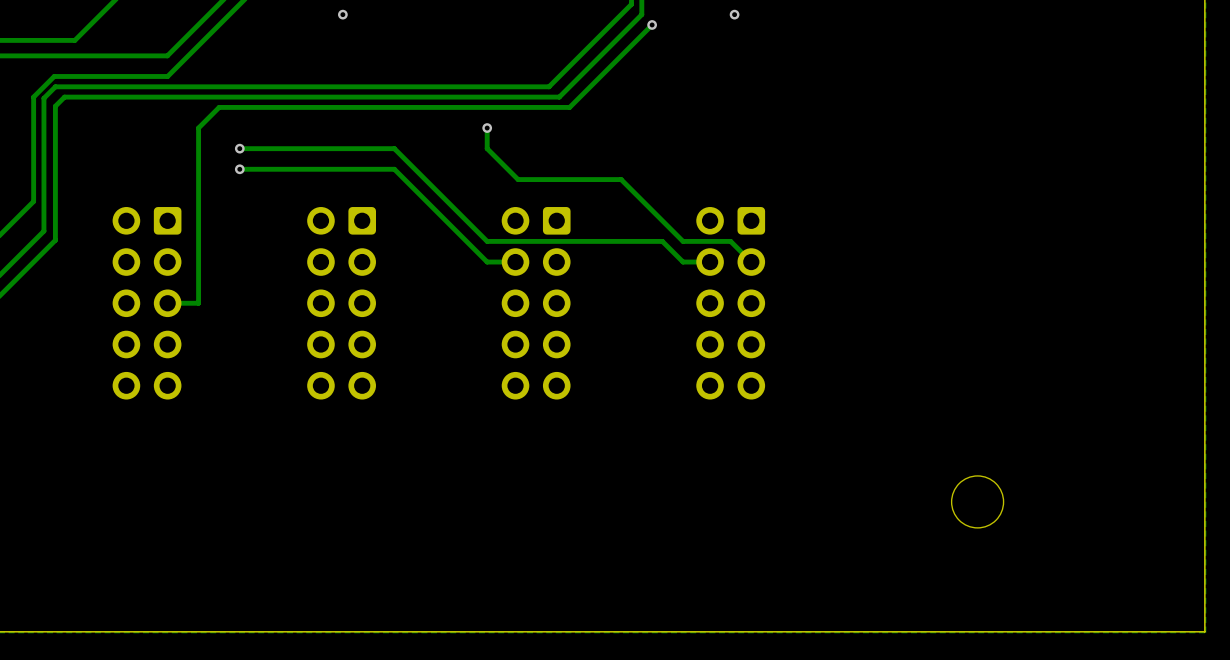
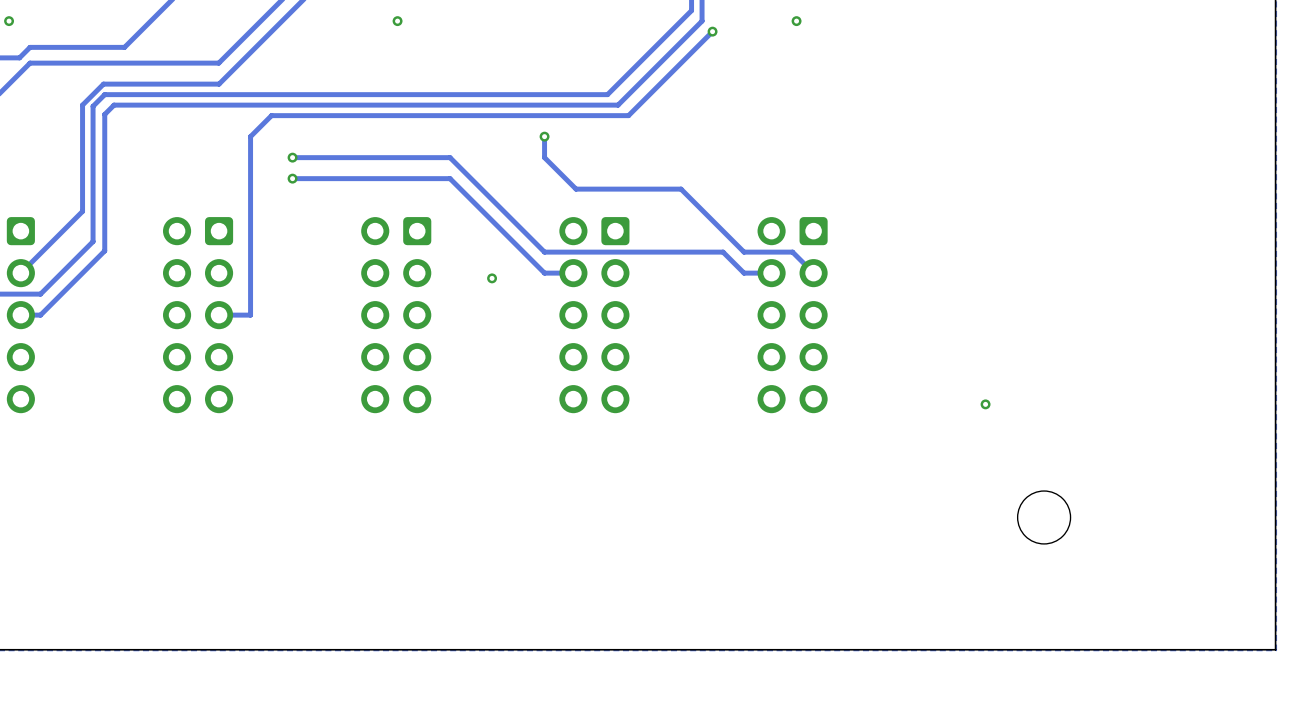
via: none -> (492, 278)
via: none -> (985, 404)

